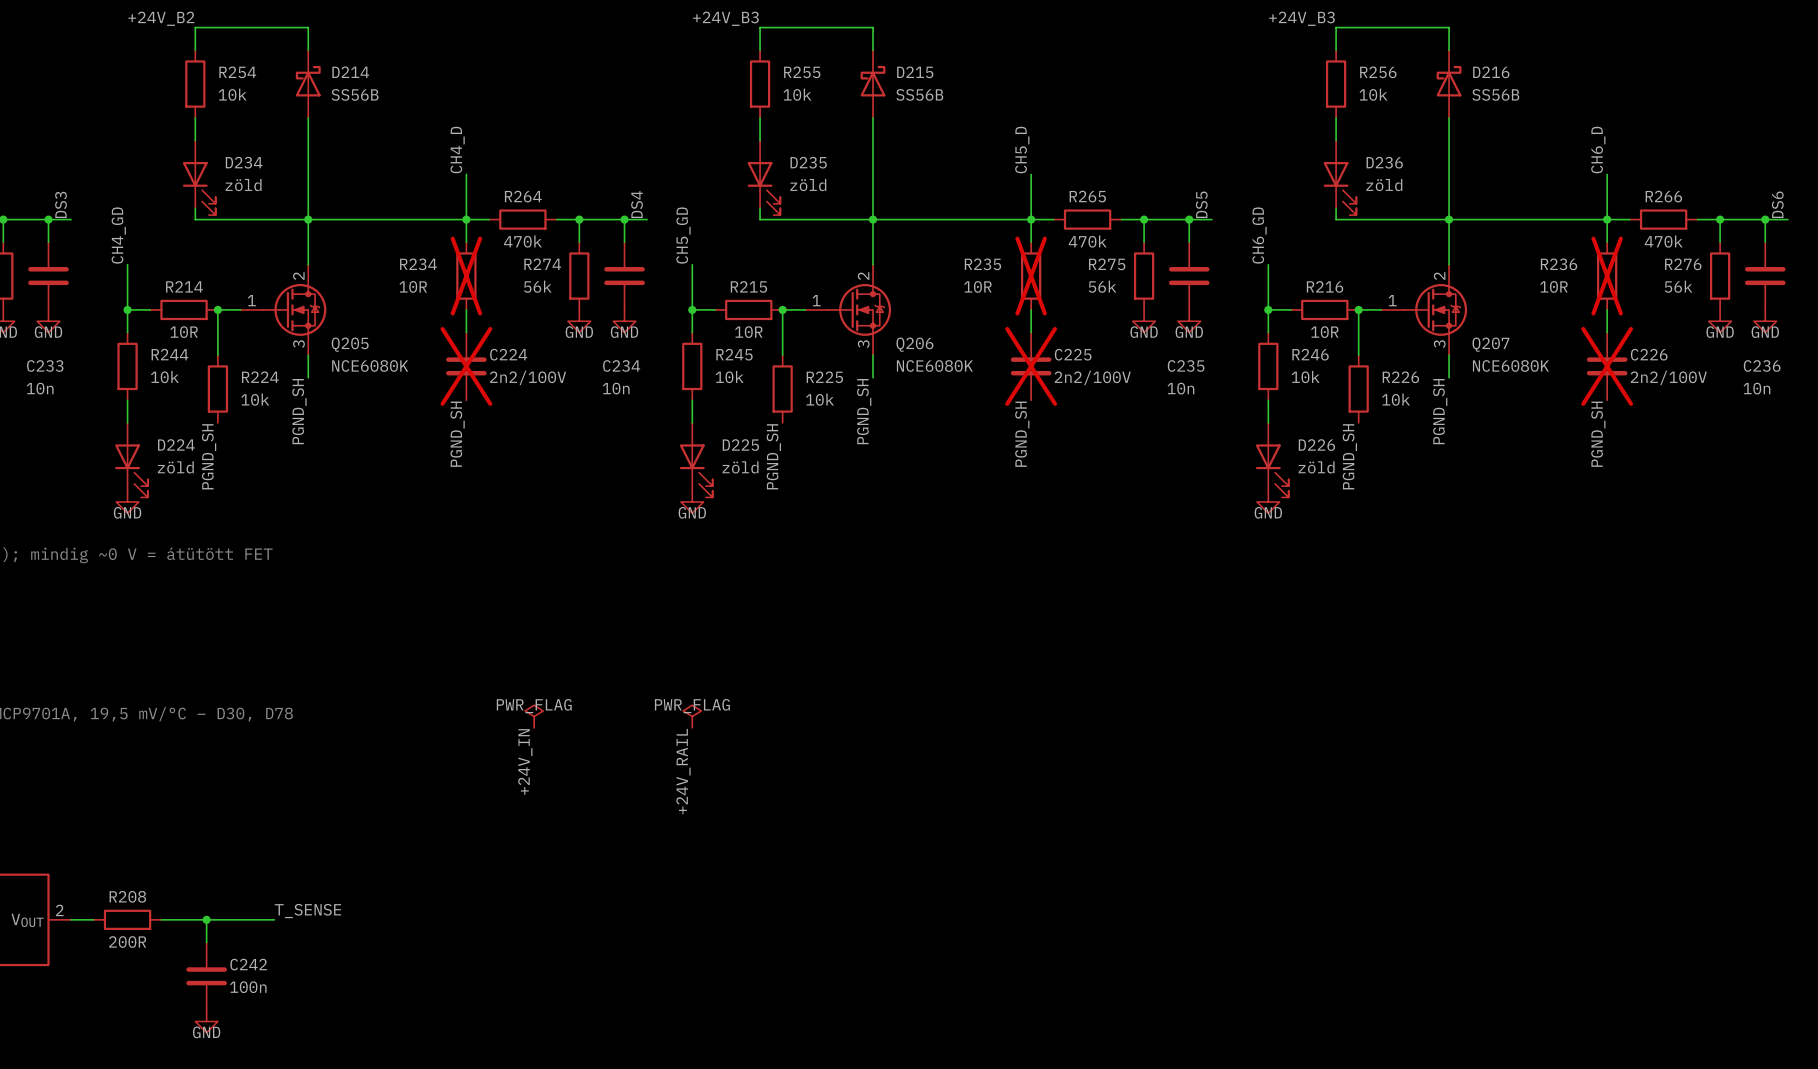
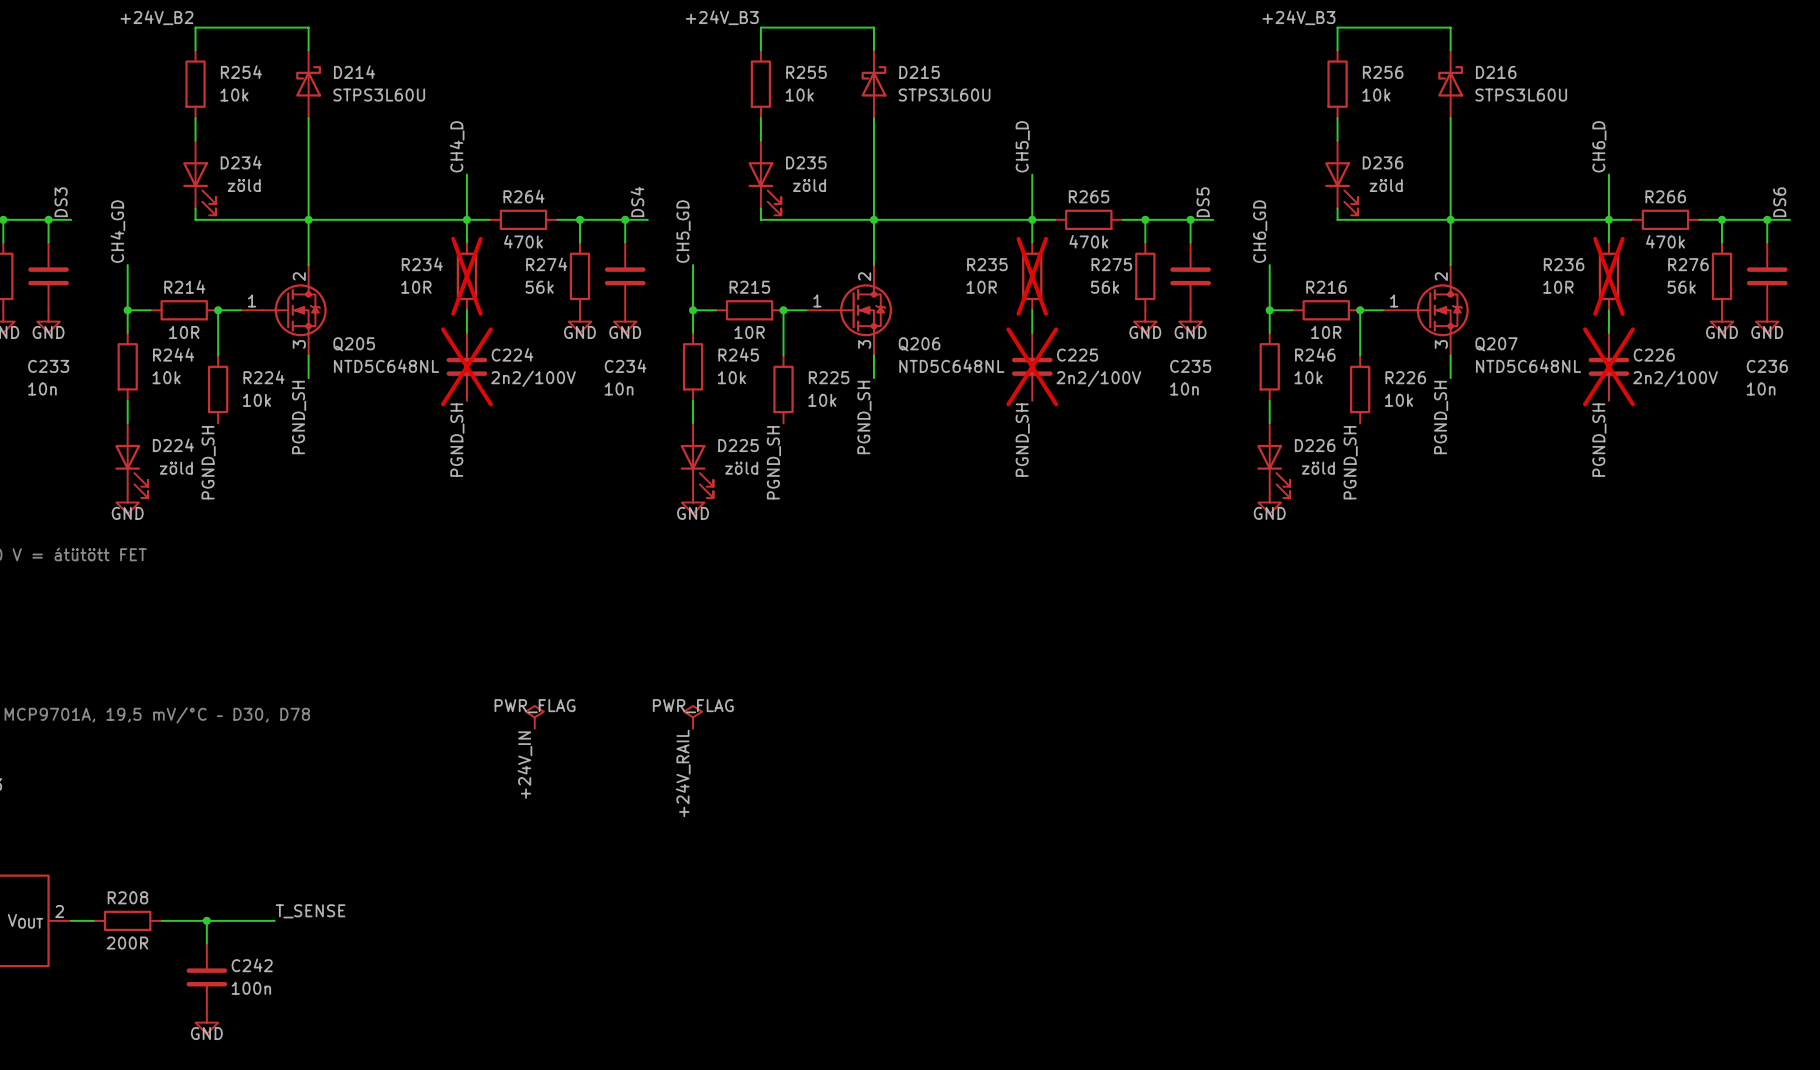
D214 value: SS56B (355, 94) -> STPS3L60U (379, 95)
D215 value: SS56B (919, 94) -> STPS3L60U (944, 95)
D216 value: SS56B (1495, 94) -> STPS3L60U (1521, 95)
Q205 value: NCE6080K (370, 365) -> NTD5C648NL (386, 366)
Q206 value: NCE6080K (934, 365) -> NTD5C648NL (951, 366)
Q207 value: NCE6080K (1510, 365) -> NTD5C648NL (1528, 366)

